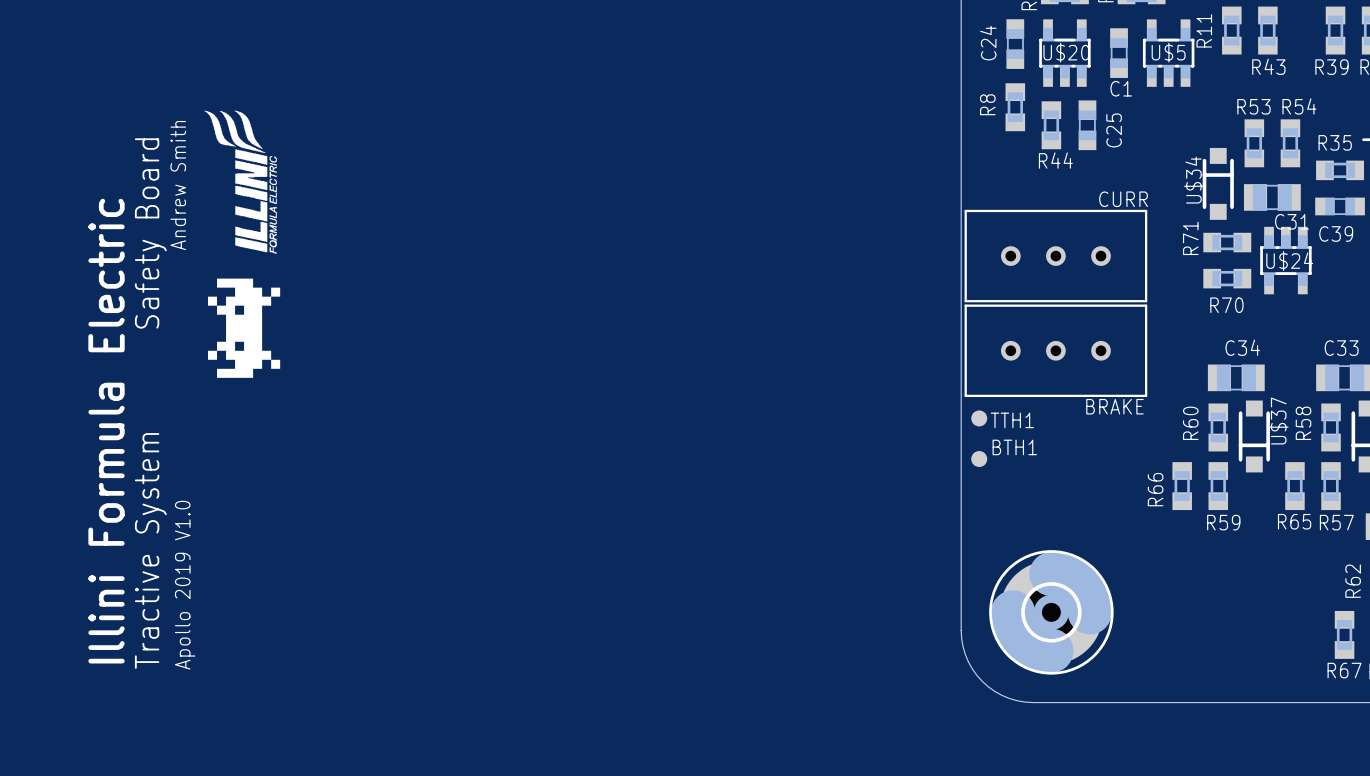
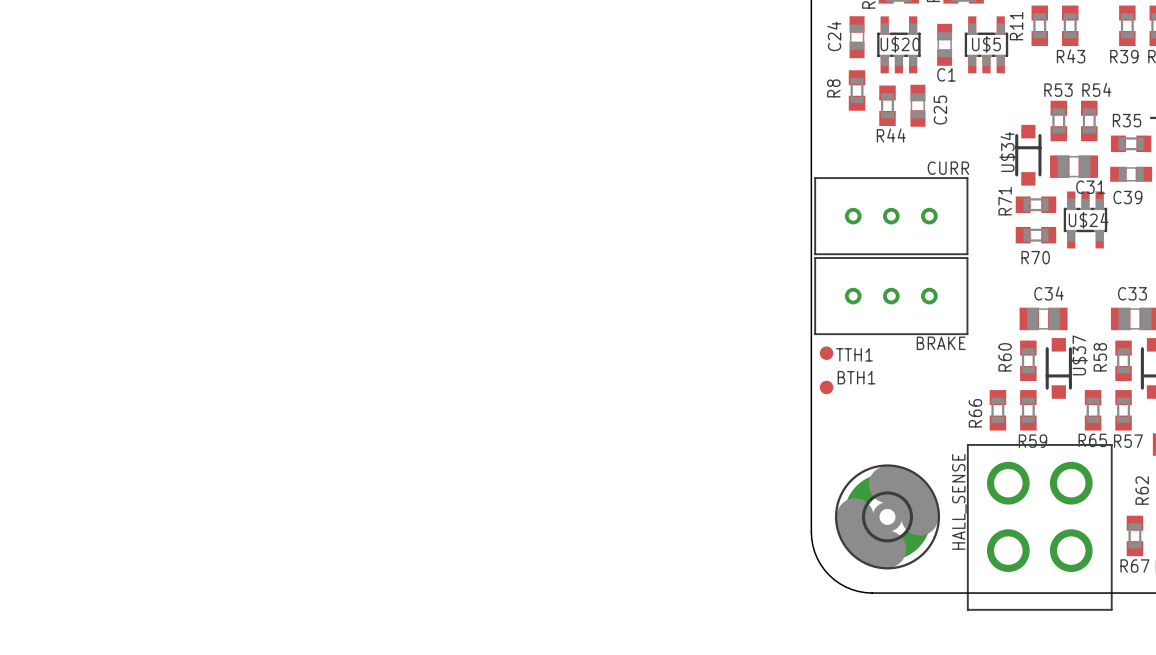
drawing: [204, 110, 277, 254] -> none
text: Andrew Smith (178, 185) -> none
text: Safety Board (150, 233) -> none
drawing: [208, 278, 281, 378] -> none
text: Illini Formula Electric (106, 431) -> none
text: Tractive System (150, 550) -> none
text: Apollo 2019 V1.0 (185, 585) -> none
HALL_SENSE: none -> (1039, 527)

